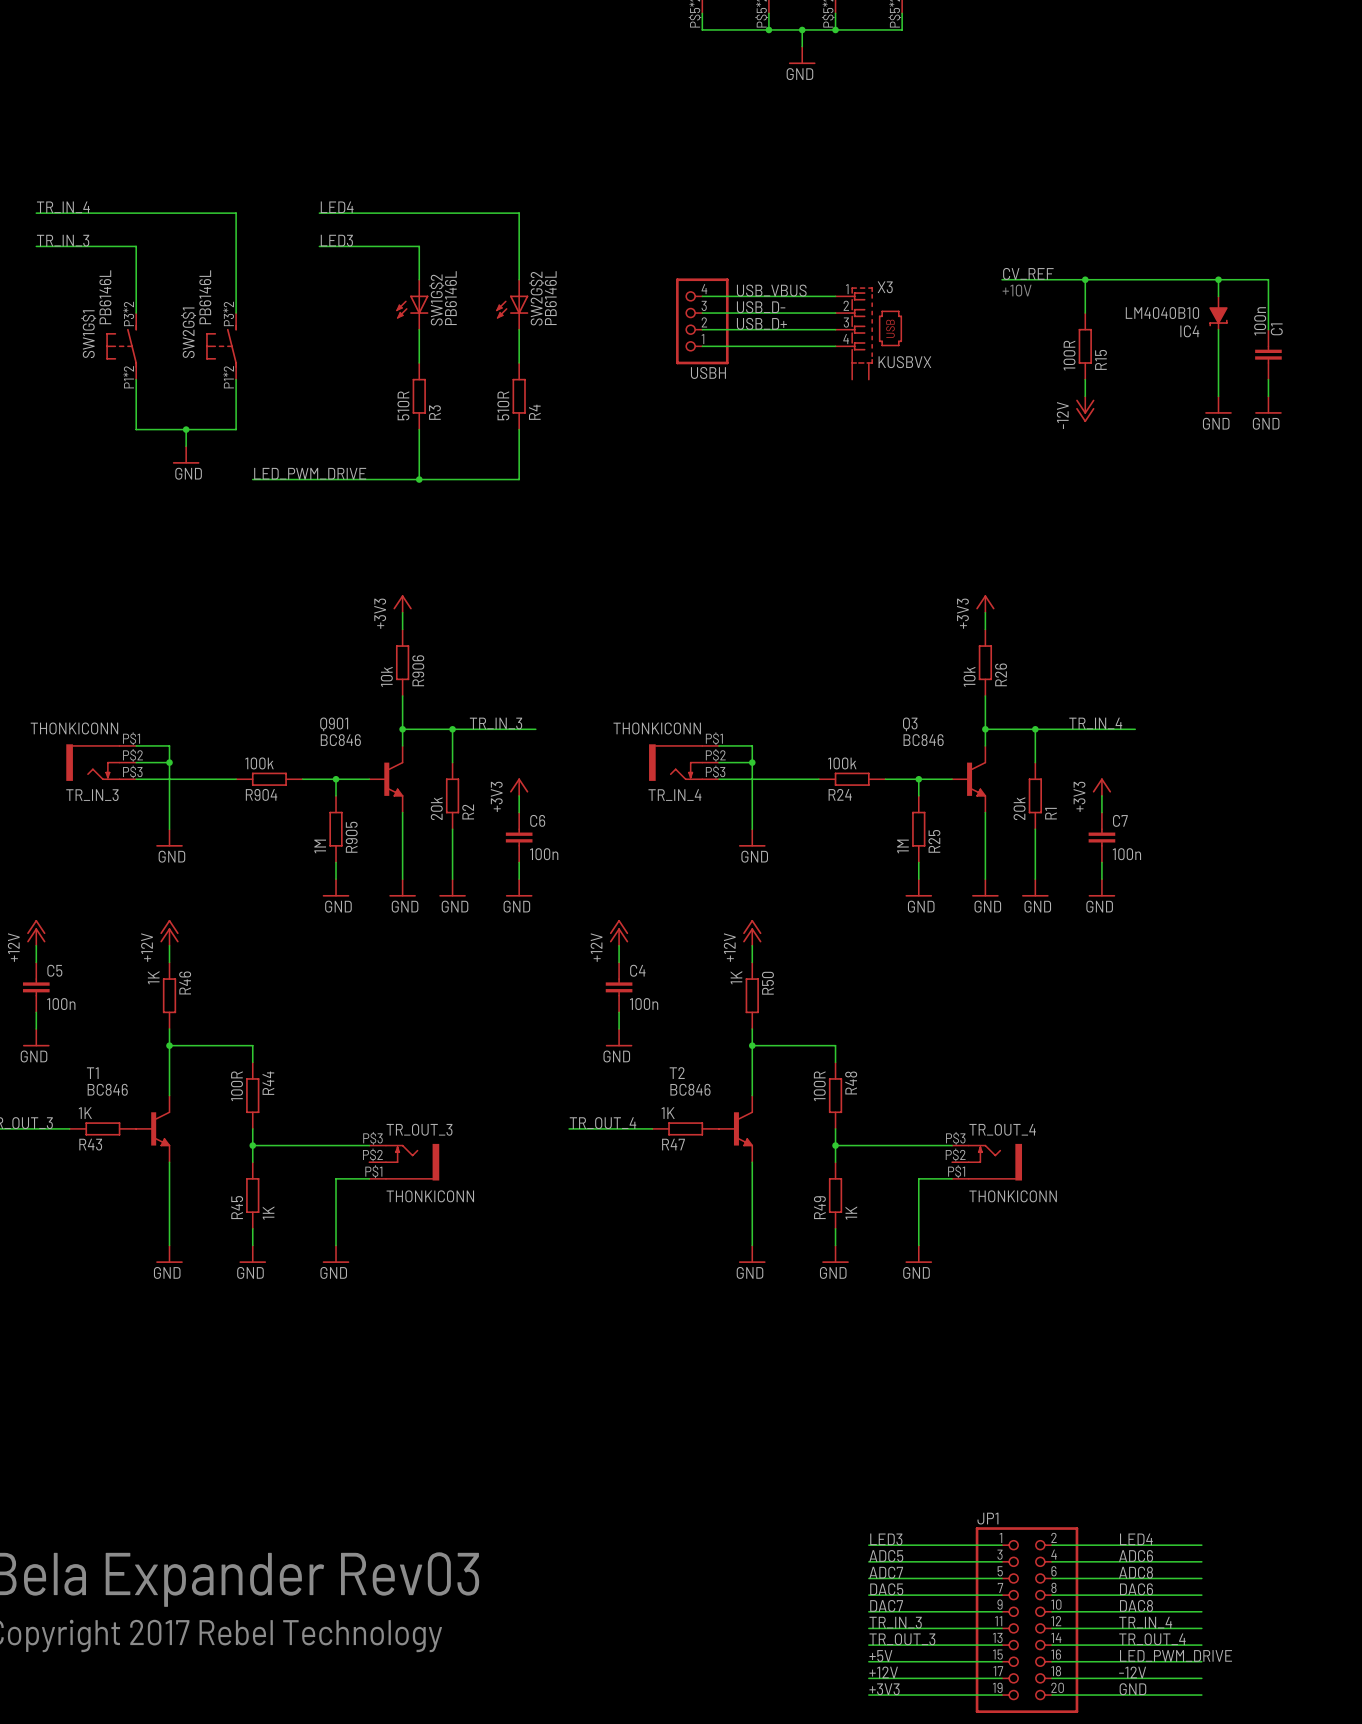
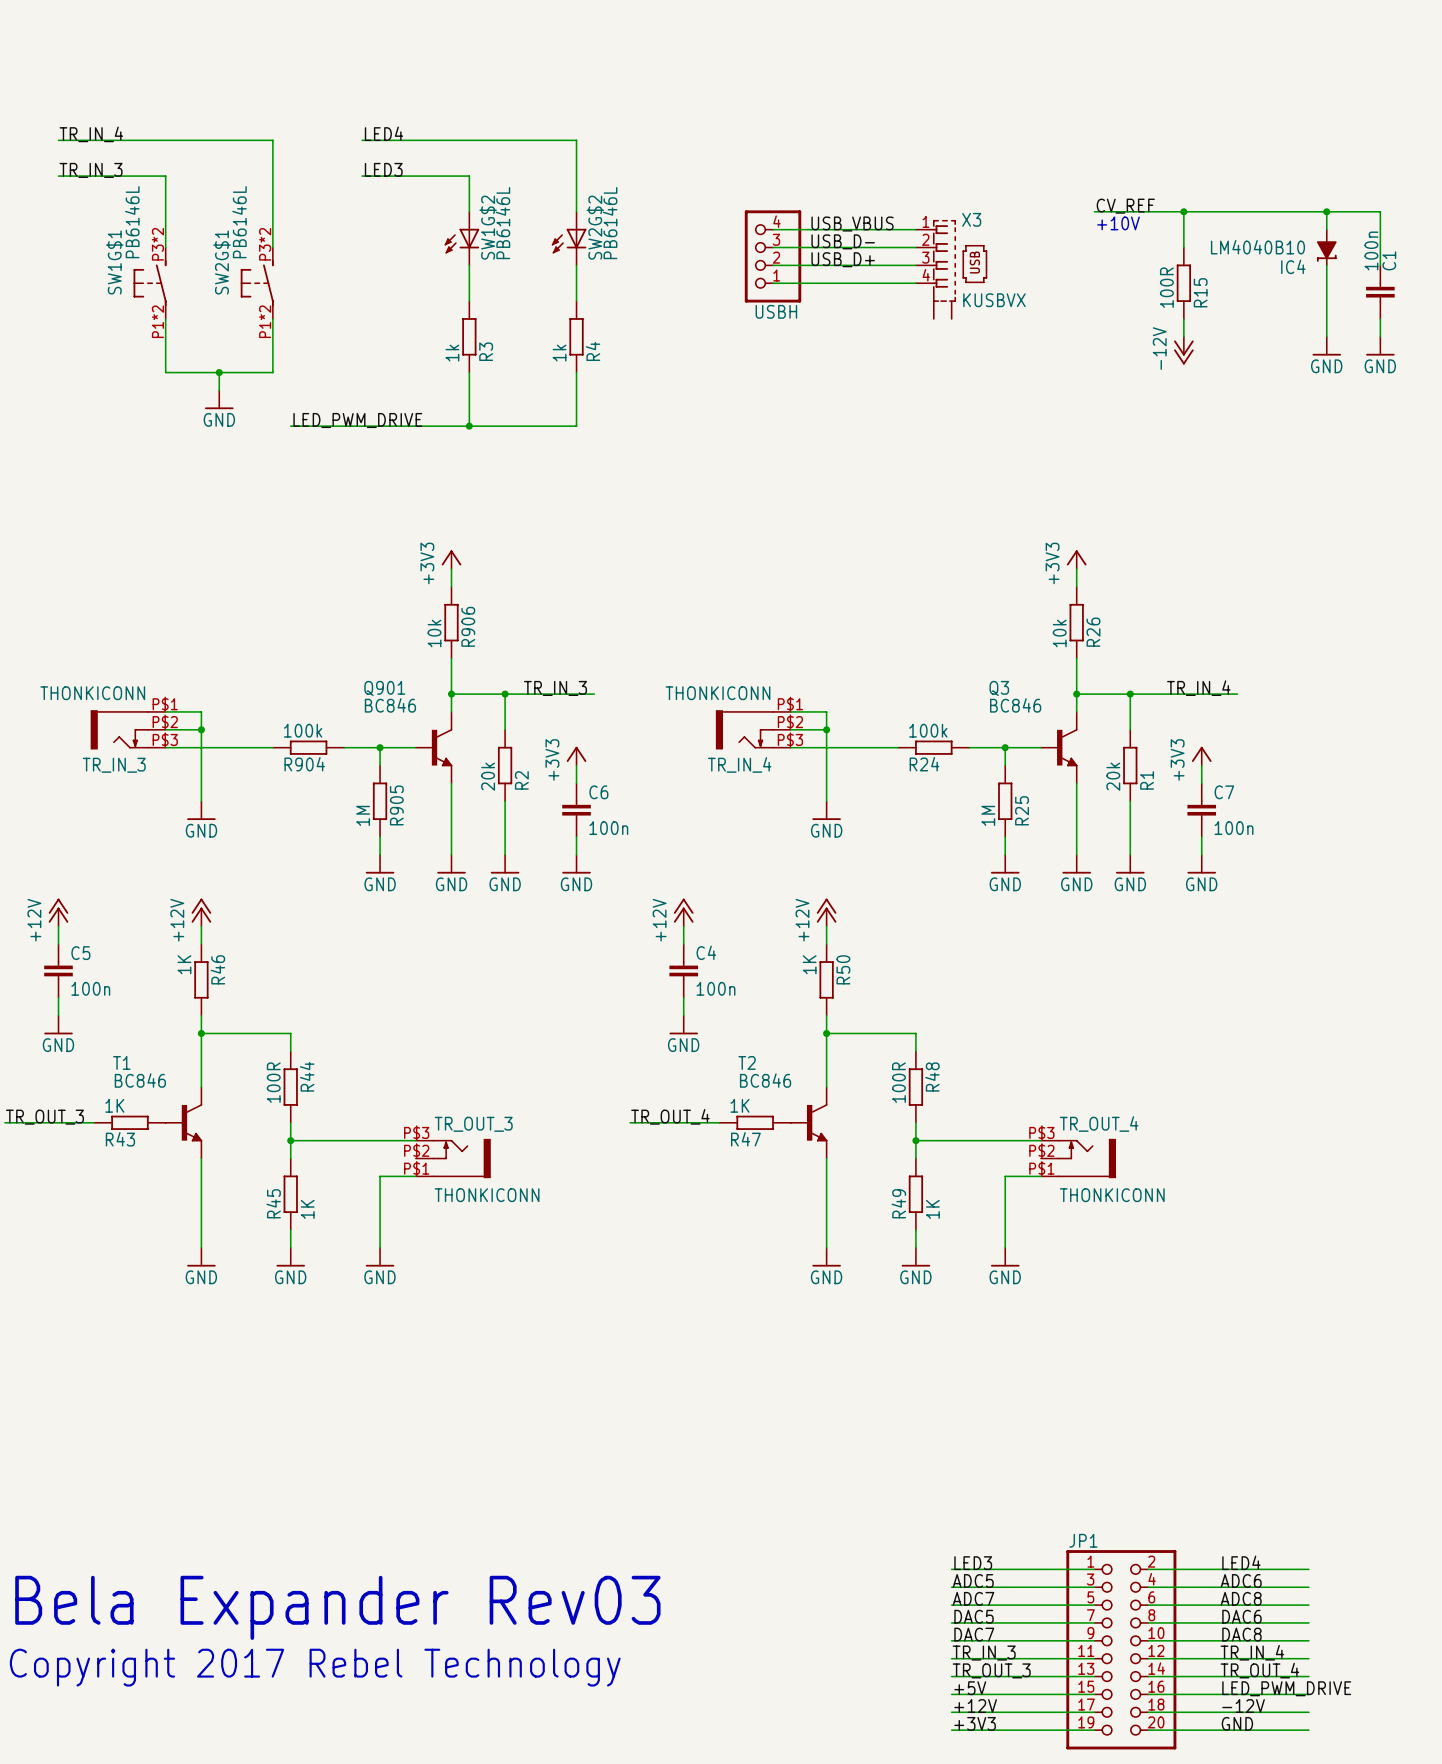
R3 value: 510R (403, 405) -> 1k (452, 353)
R4 value: 510R (503, 405) -> 1k (559, 353)

